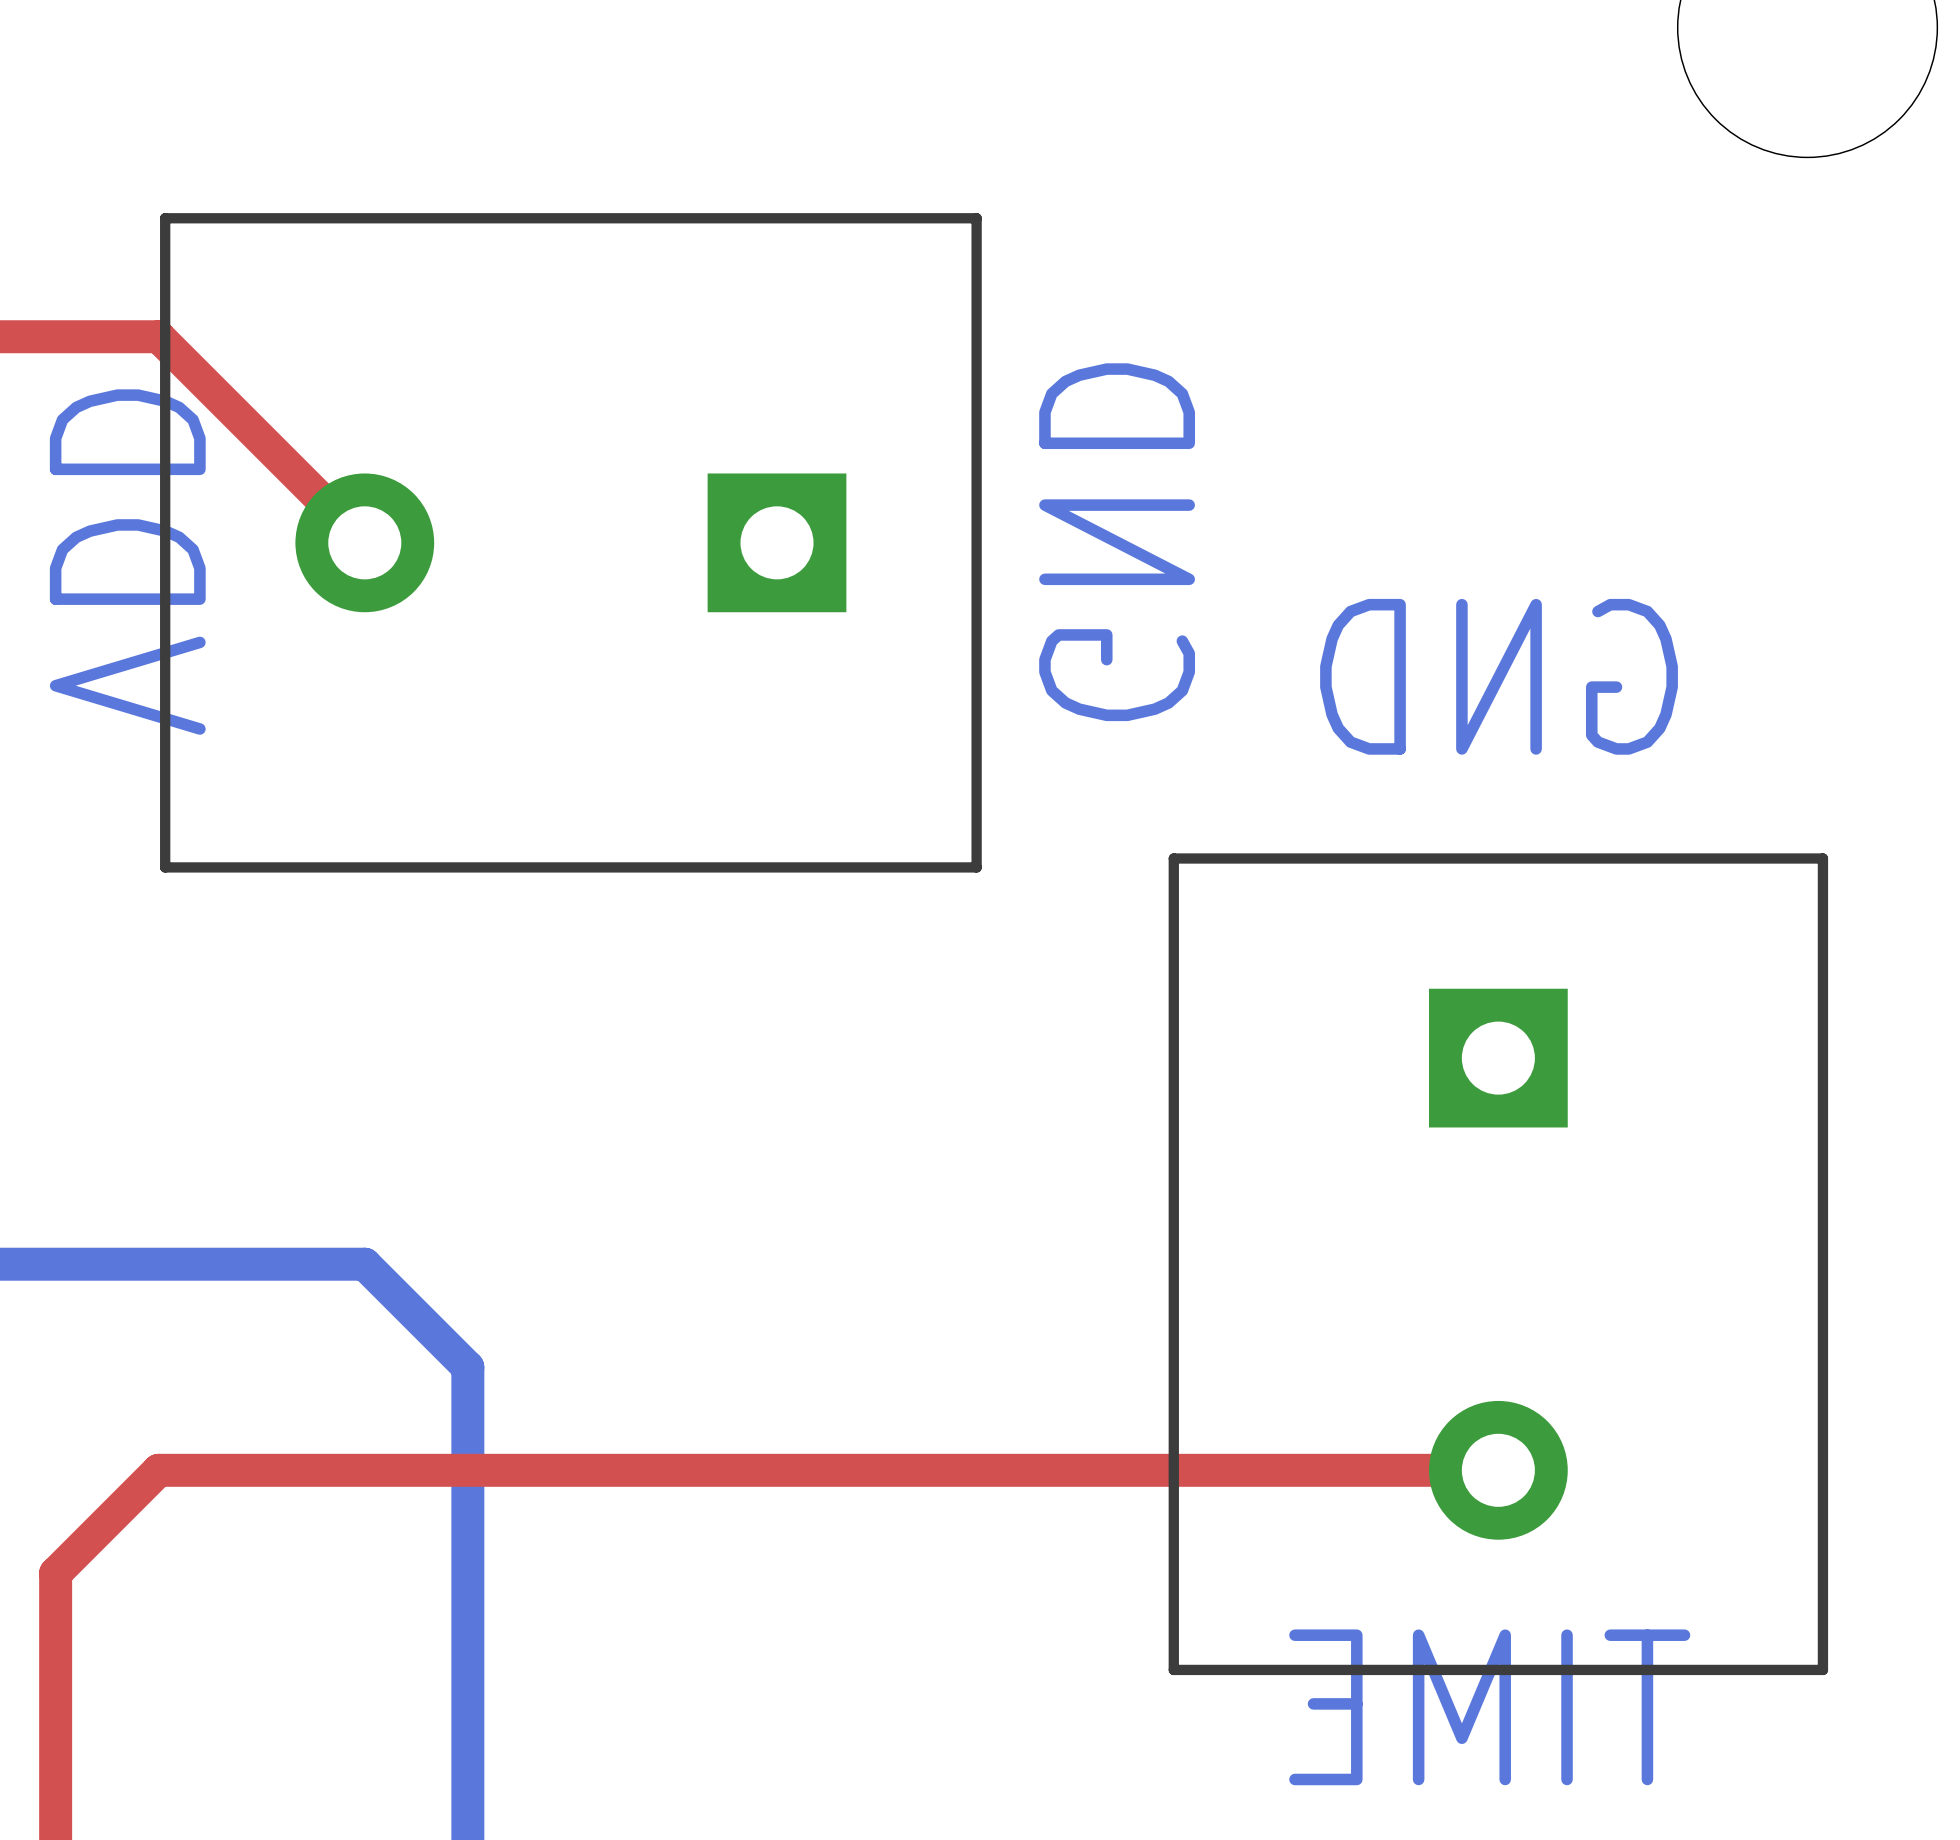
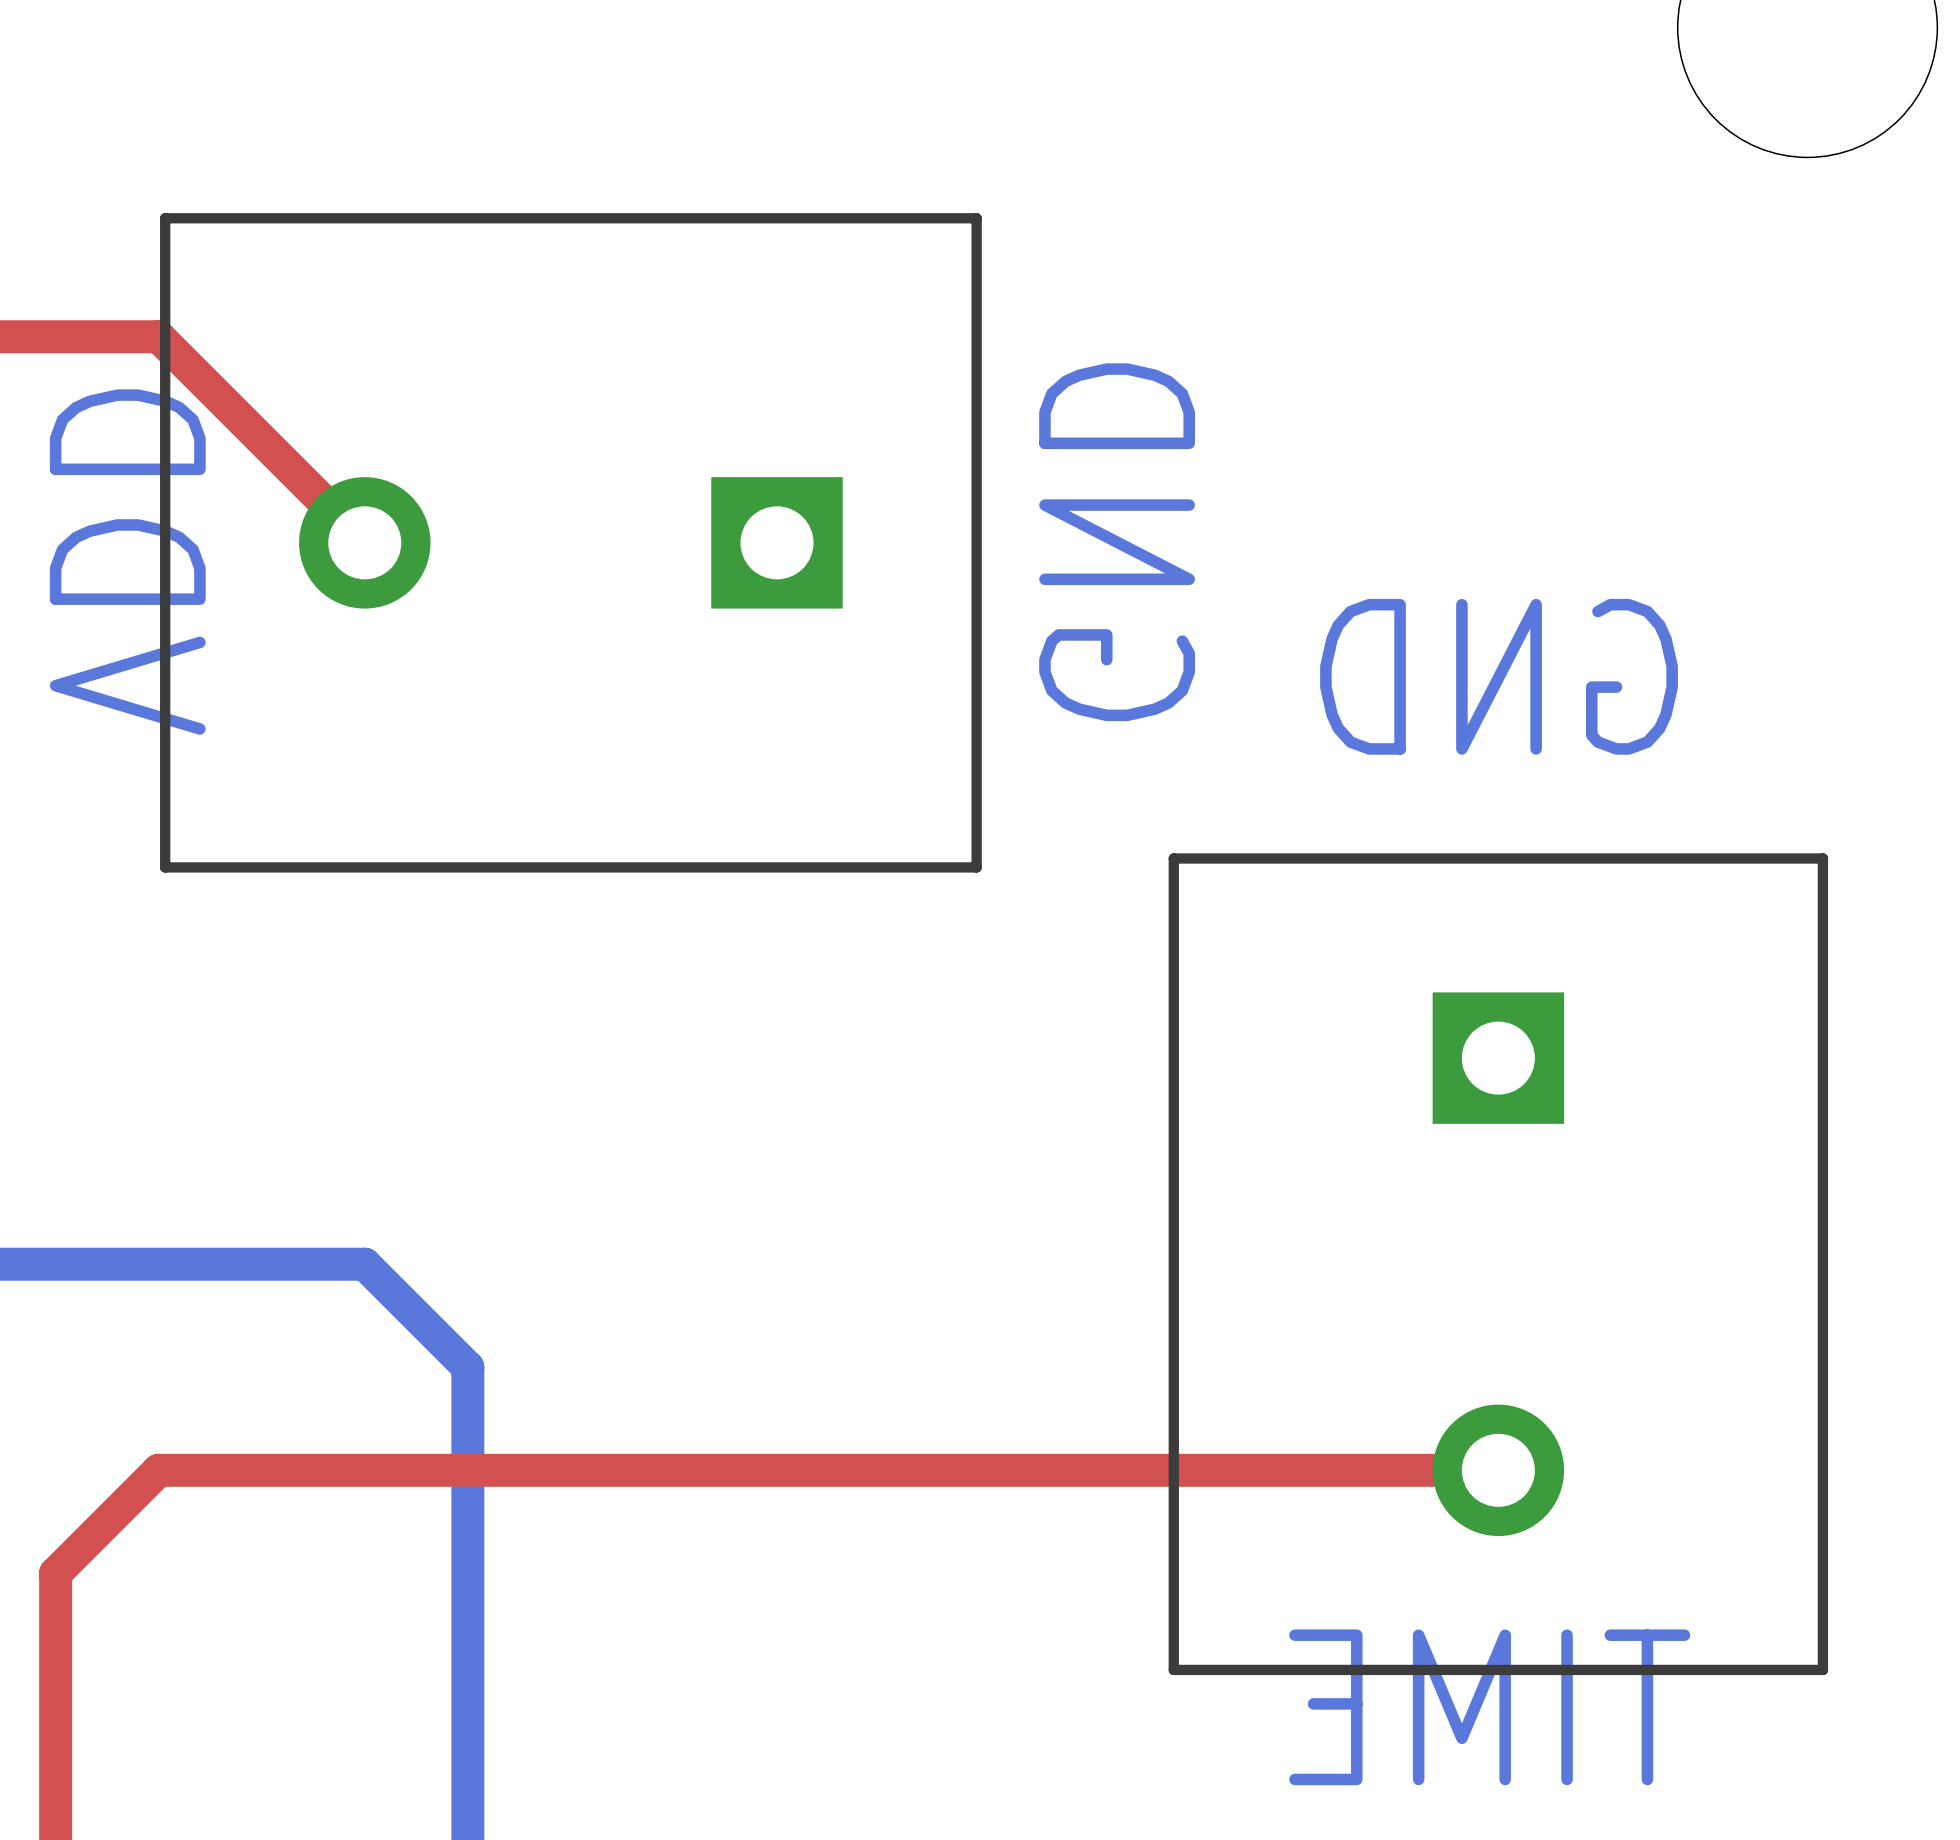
part footprint: [160, 213, 982, 873] -> [160, 213, 982, 873]
part footprint: [1168, 853, 1829, 1676] -> [1168, 853, 1829, 1676]

